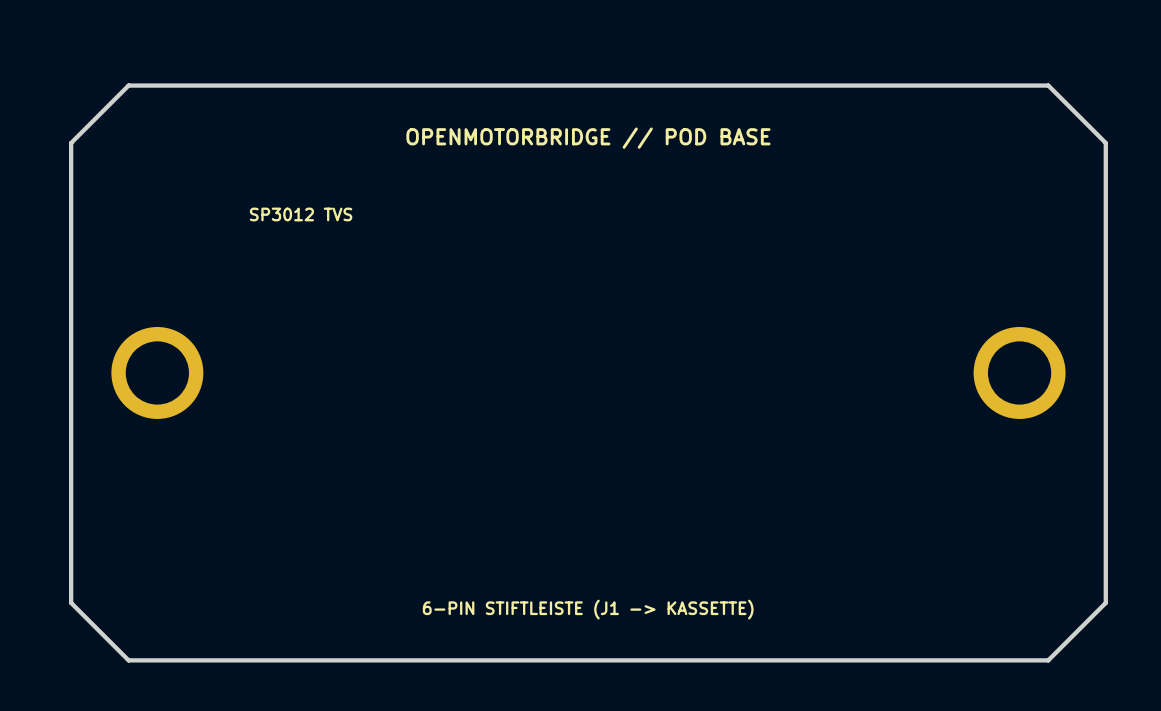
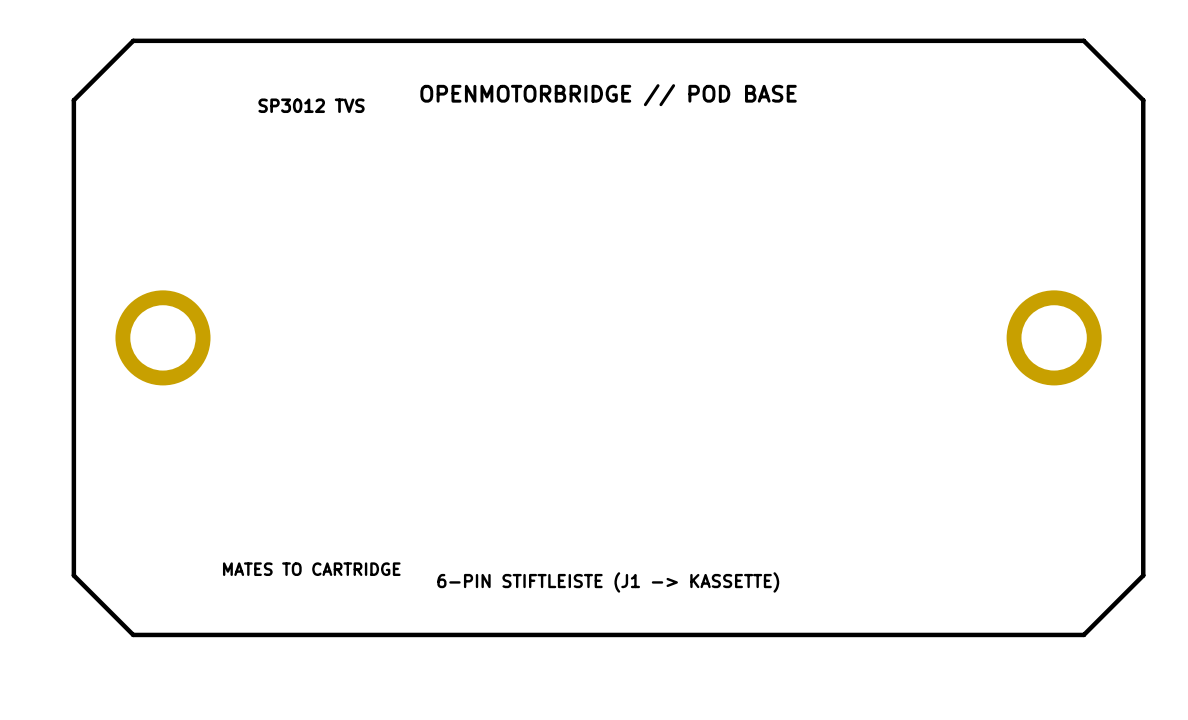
text position: SP3012 TVS (301, 214) -> SP3012 TVS (311, 105)
text: none -> MATES TO CARTRIDGE (311, 569)

